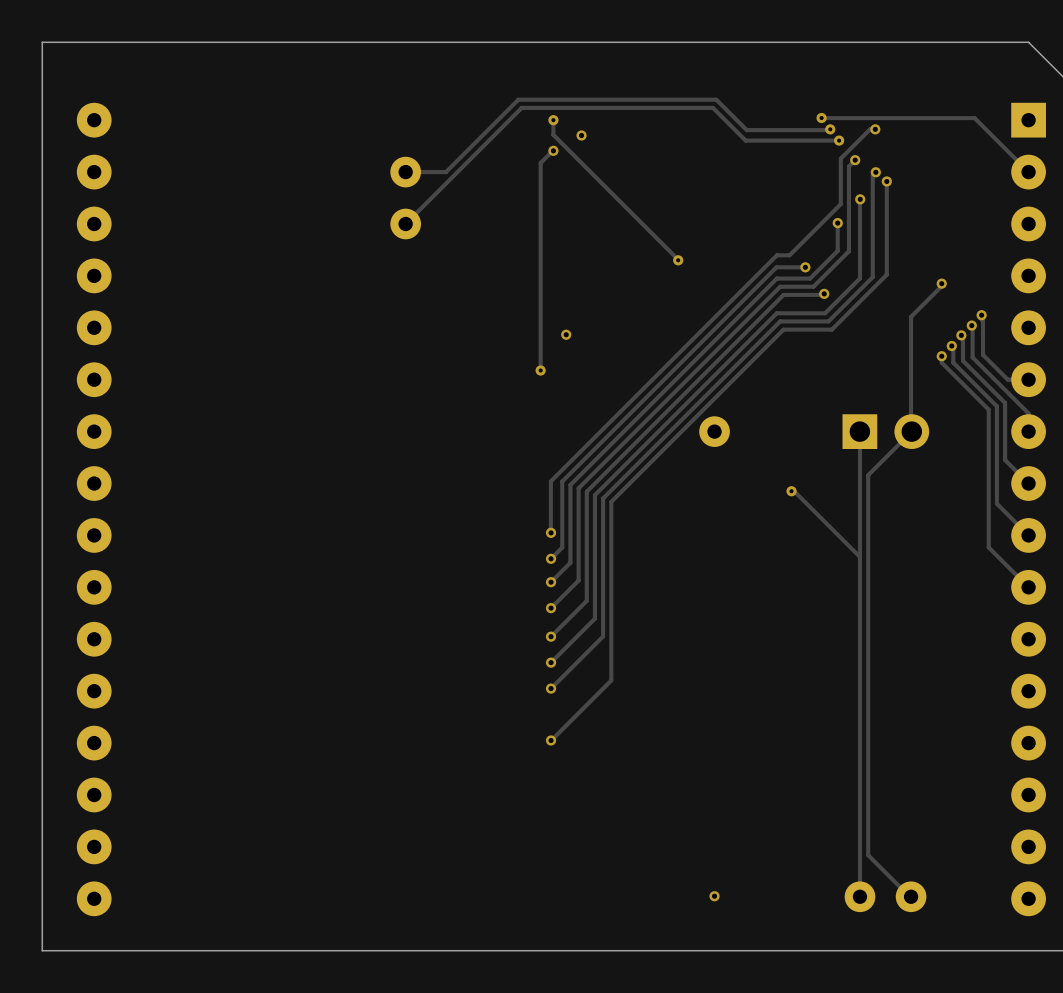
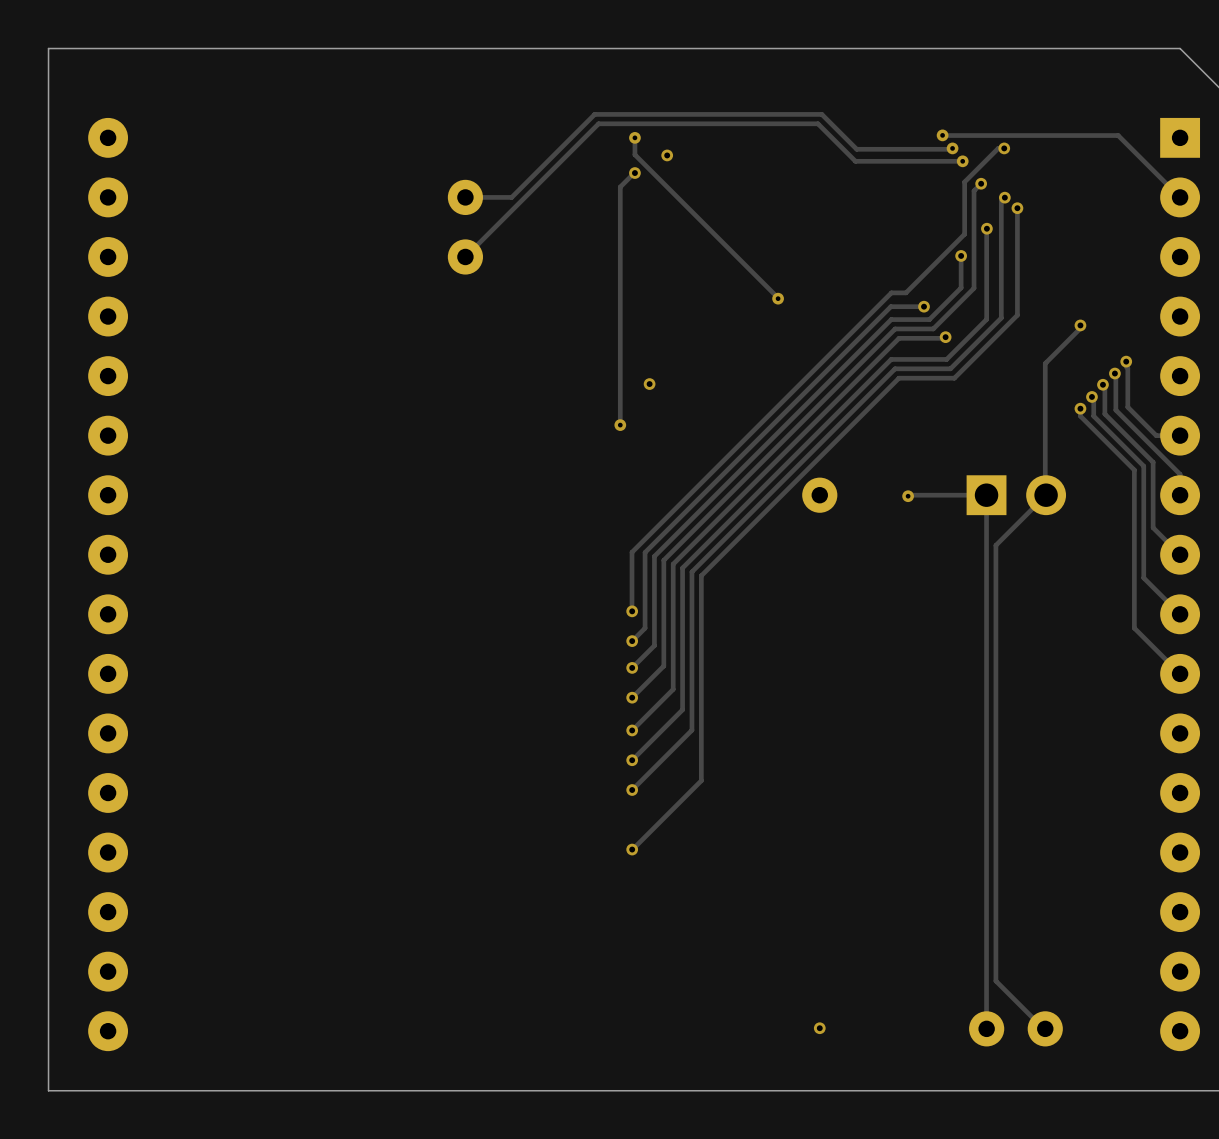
track: none -> (986, 495) (908, 496)
track: (791, 491) (794, 491) (859, 557) -> none
via position: (791, 491) -> (908, 496)

